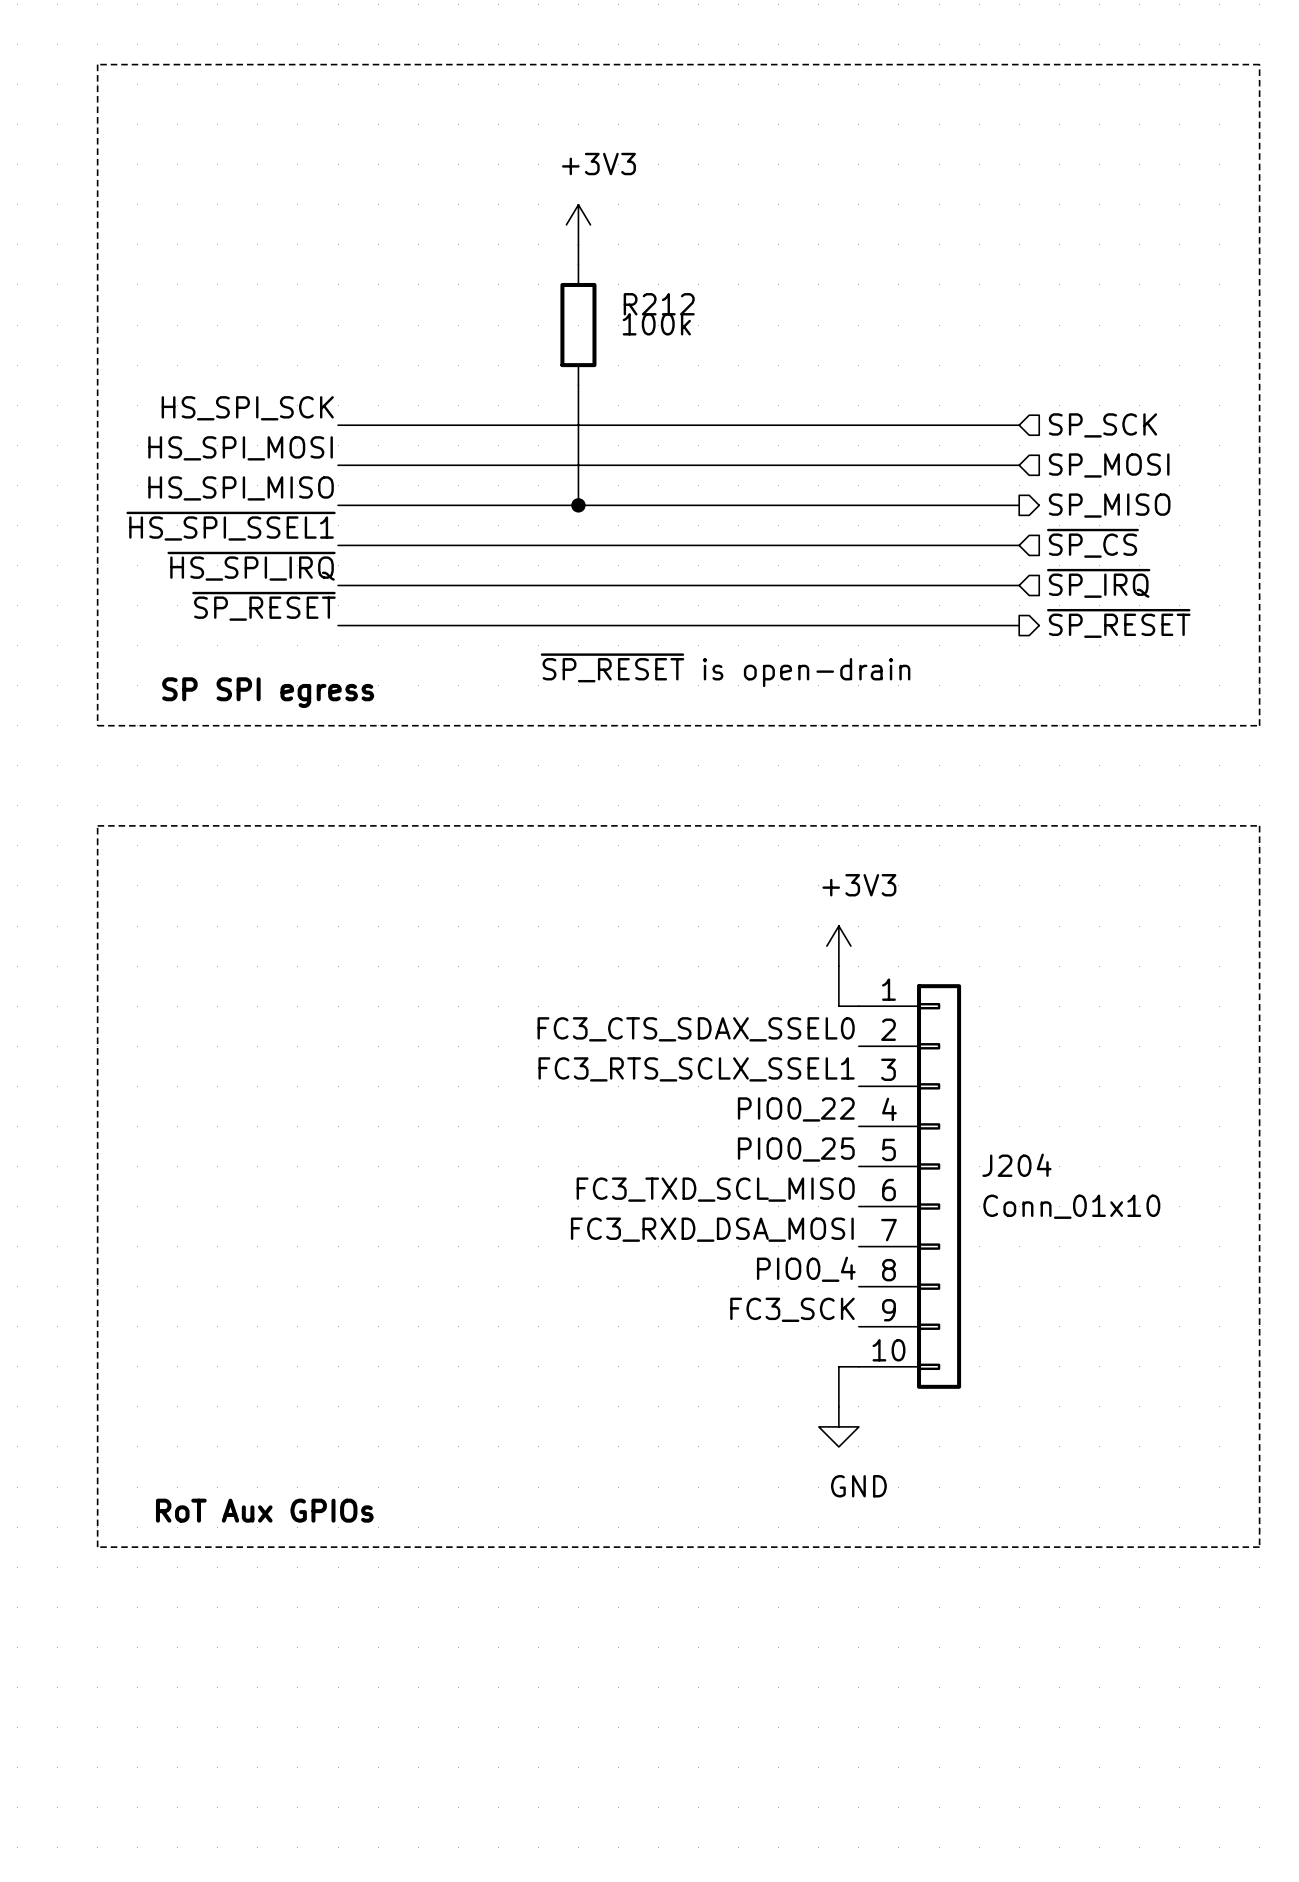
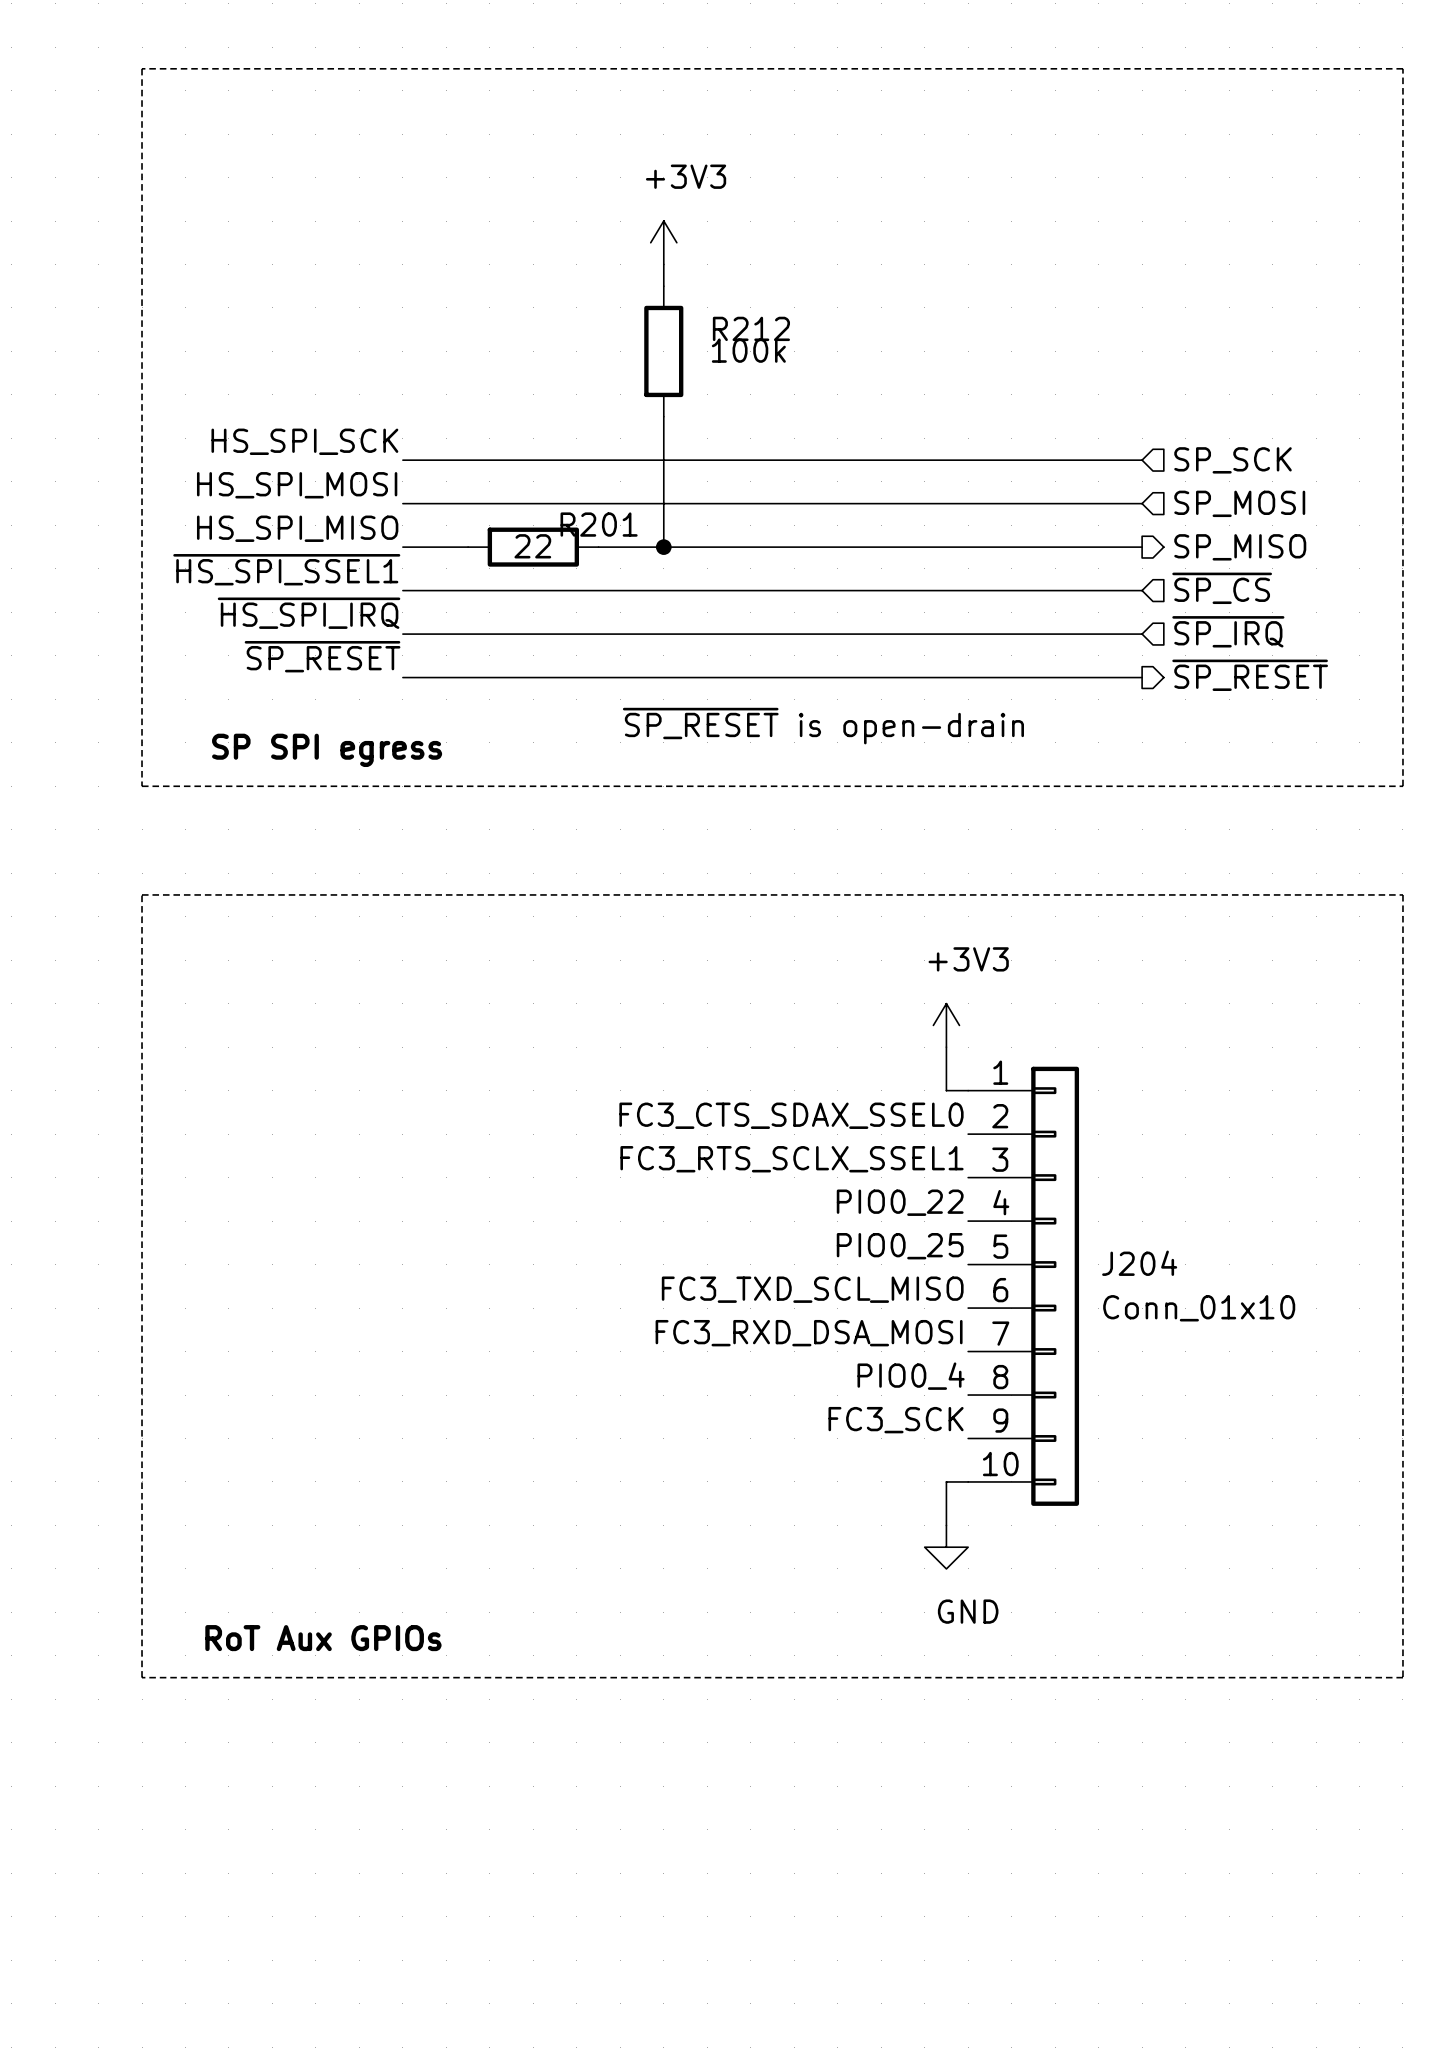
wire: (398, 505) (518, 505) -> none
R201: none -> 22 (533, 547)

